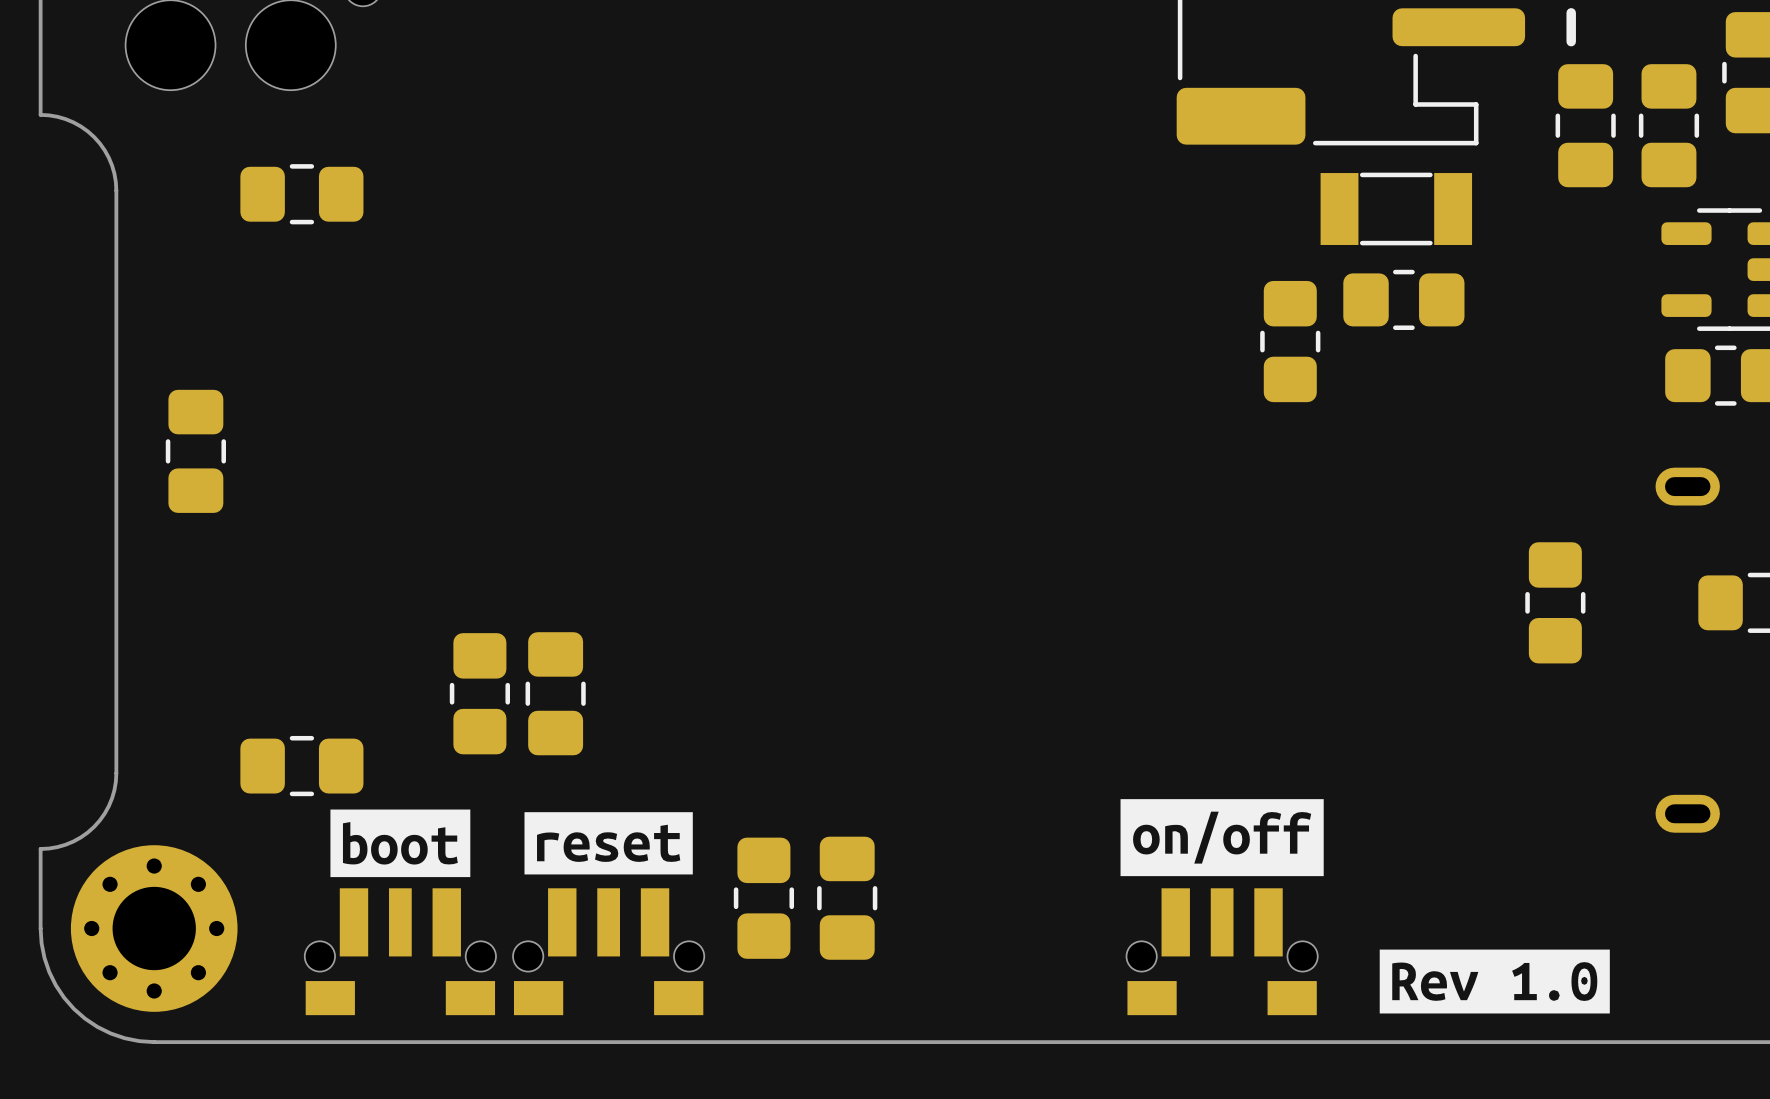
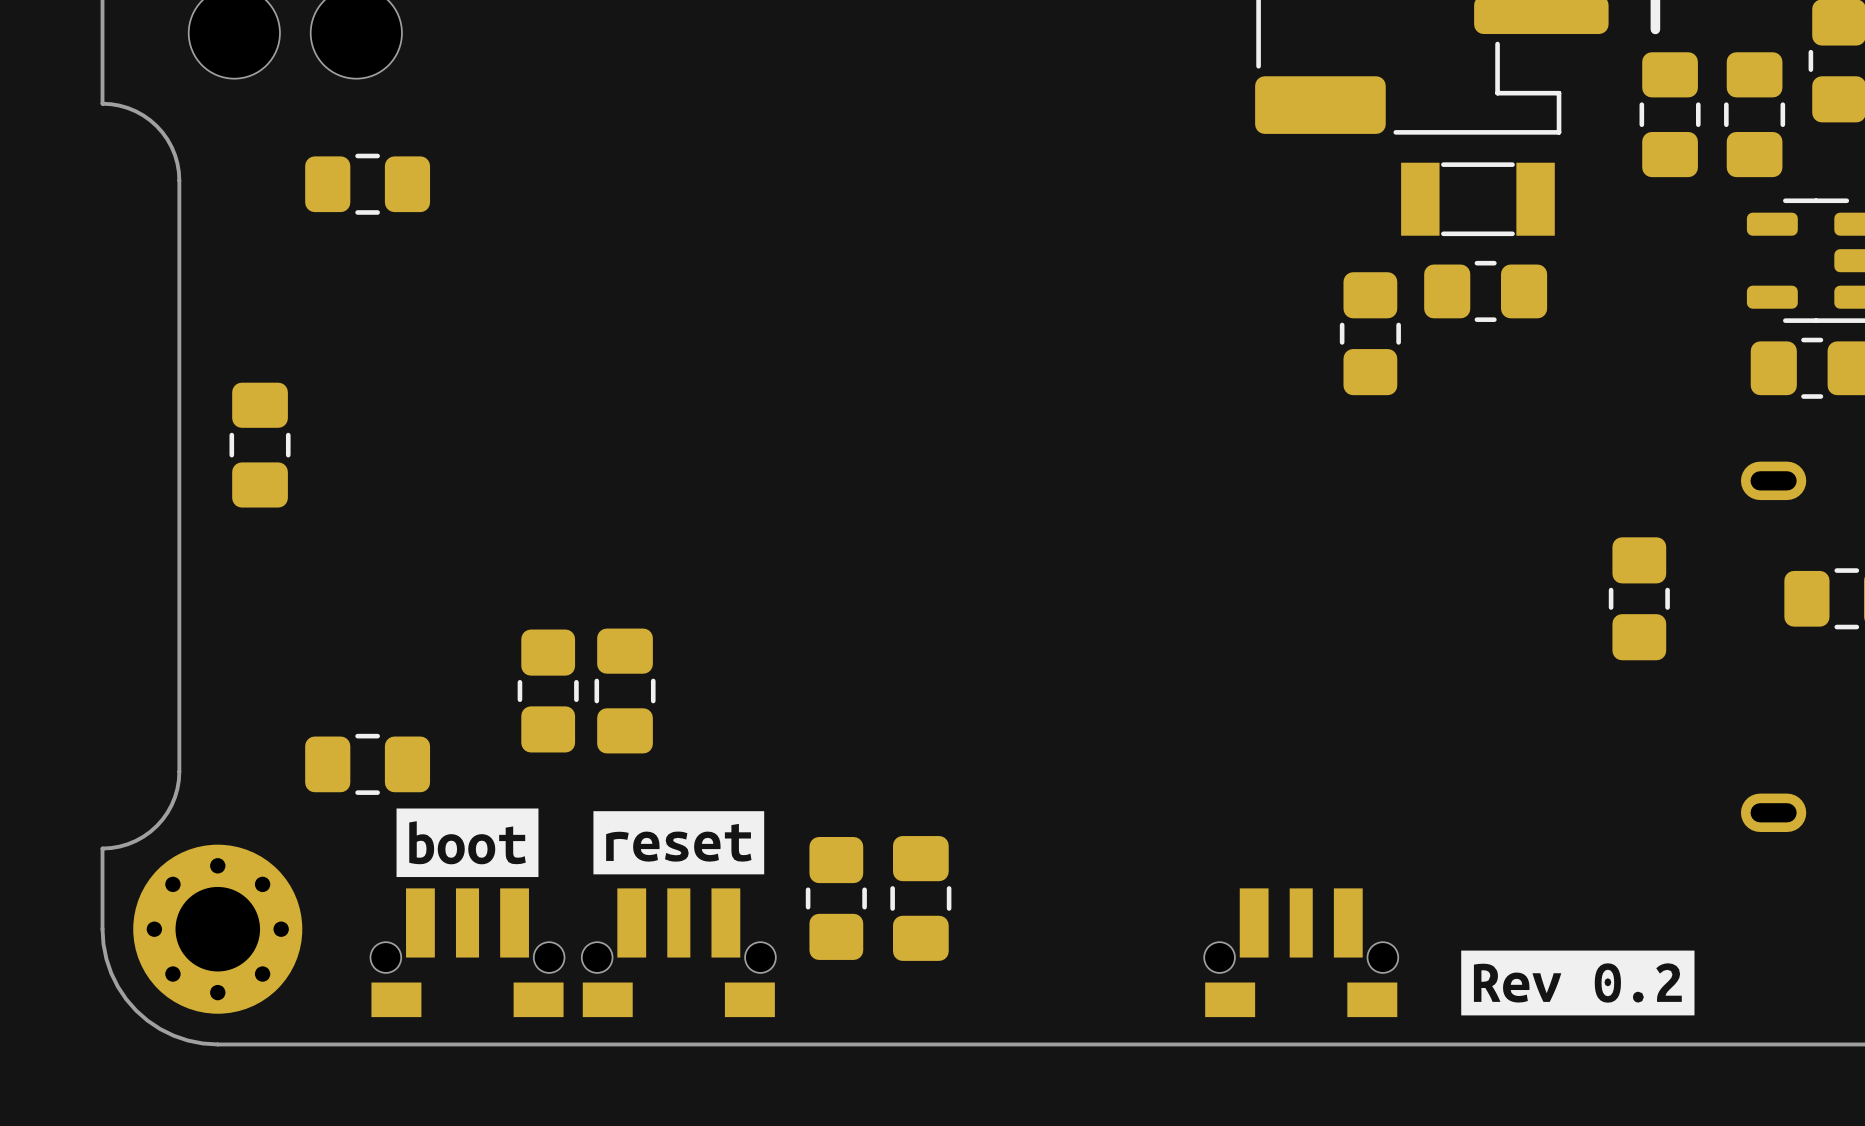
drawing: [1120, 799, 1324, 877] -> none
drawing shape: [1379, 949, 1610, 1014] -> [1461, 950, 1695, 1016]

